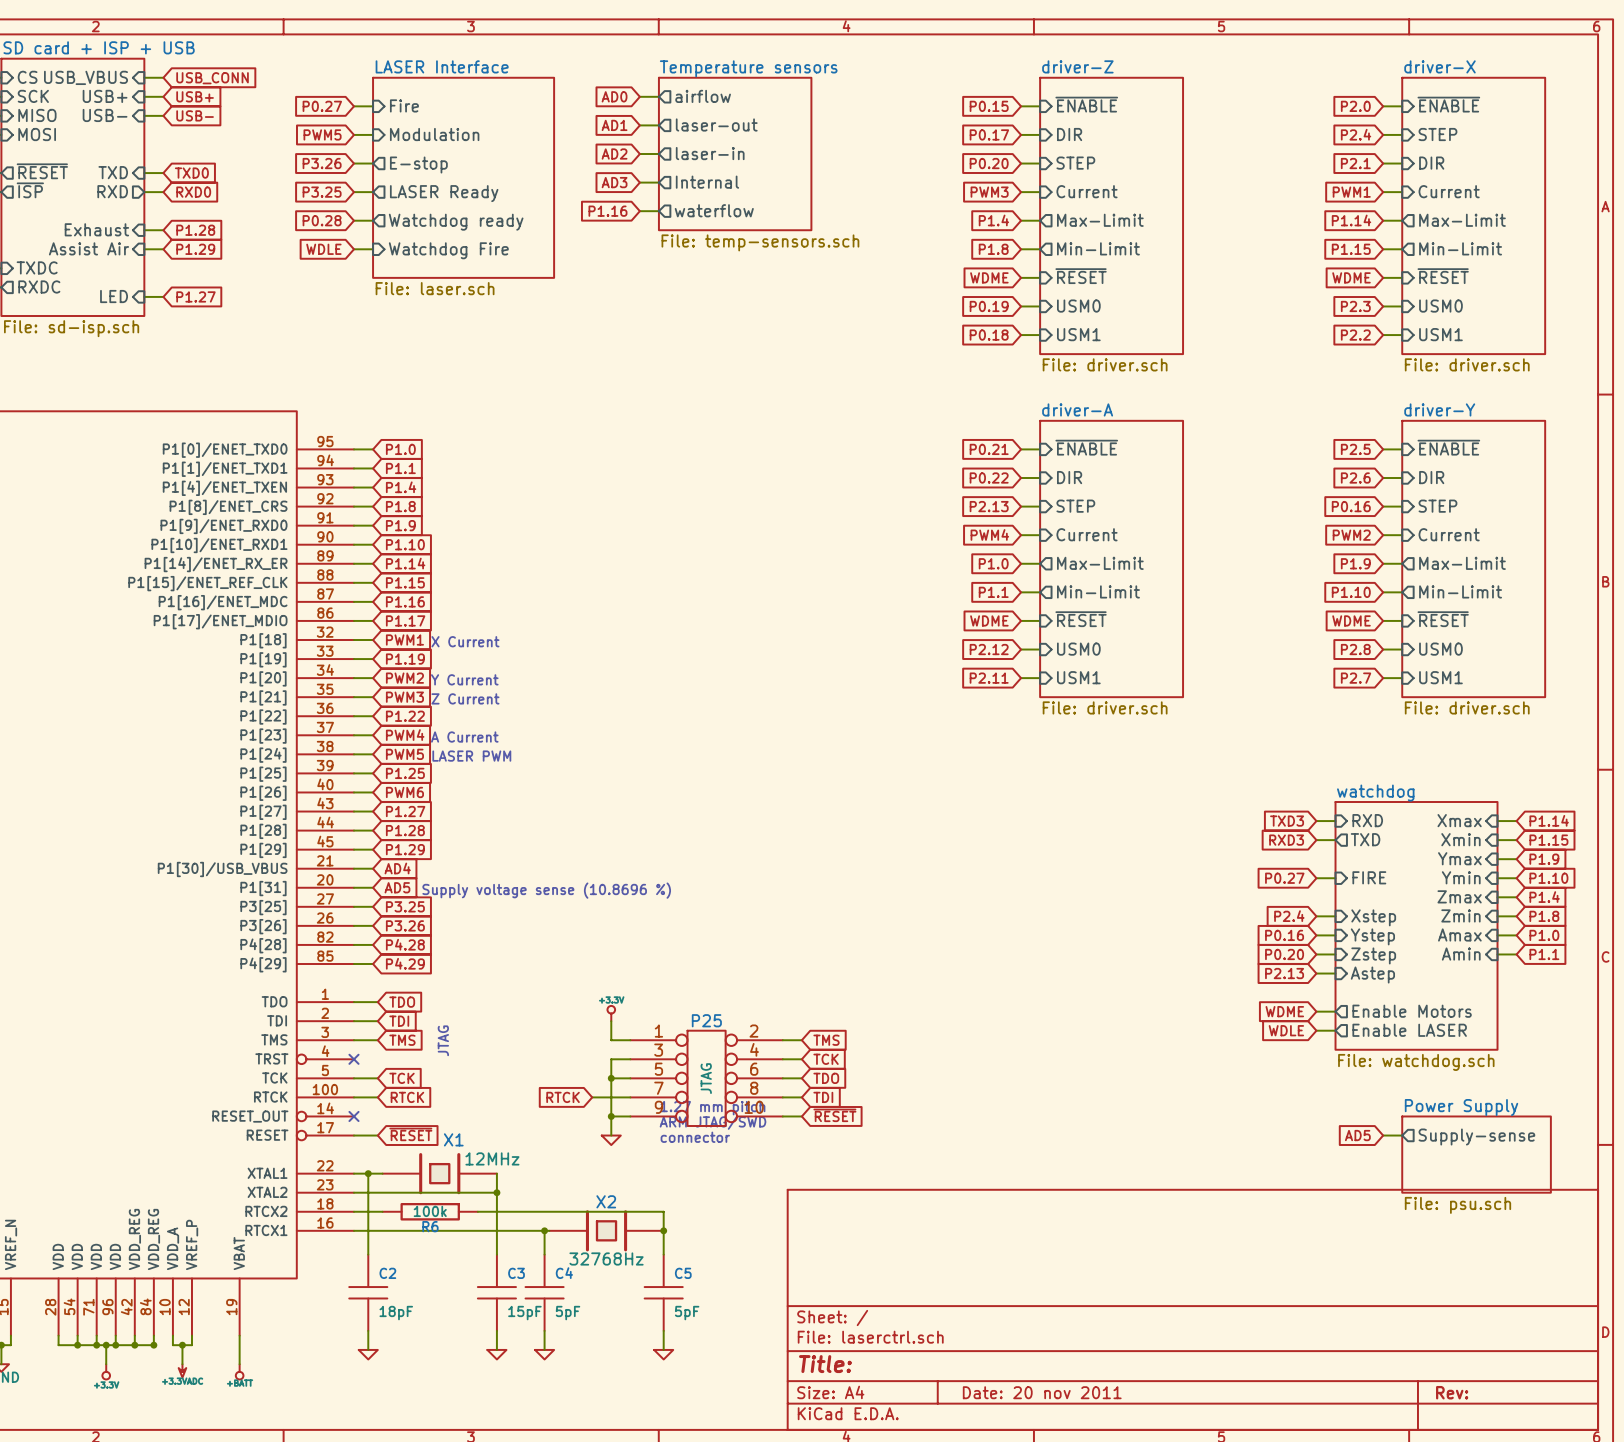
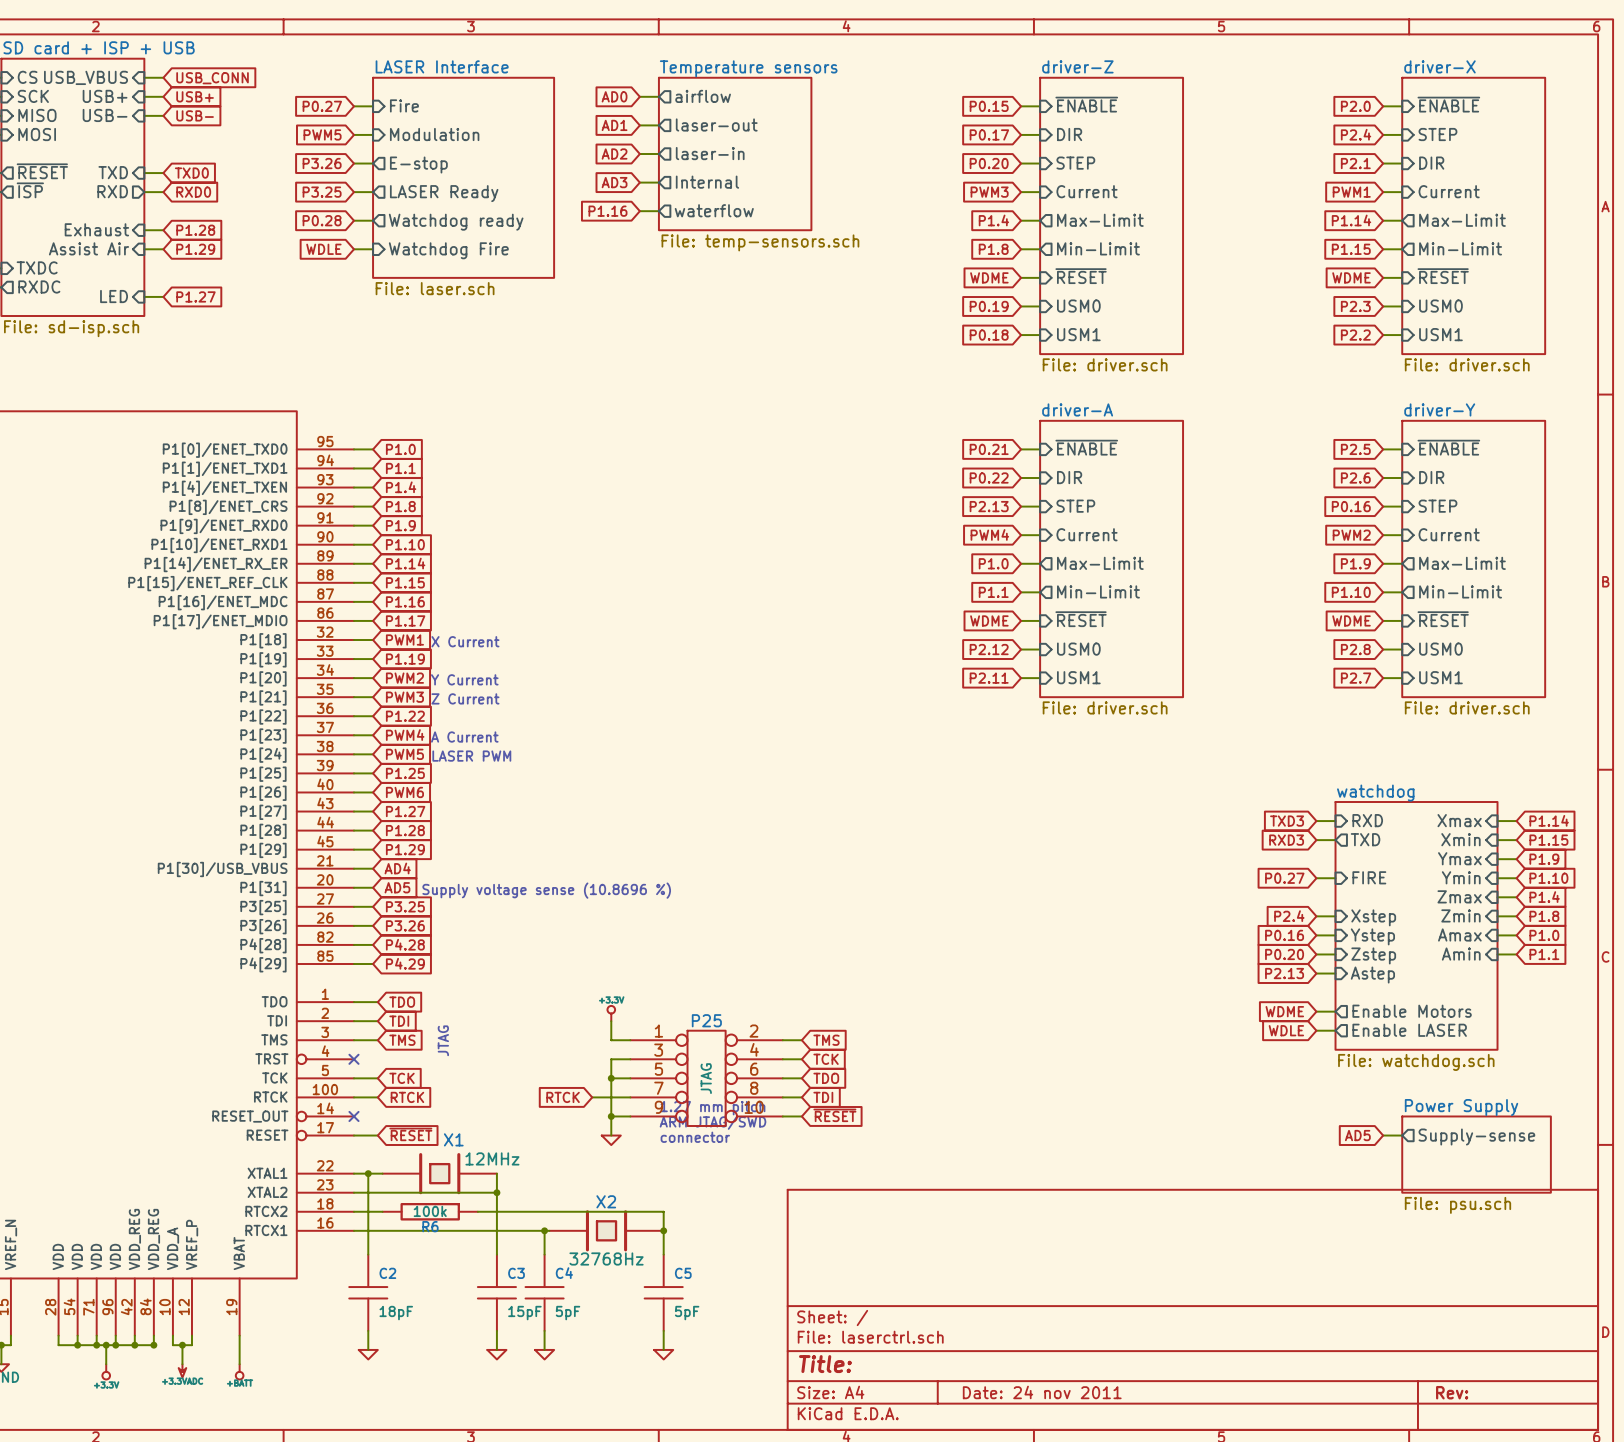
title block: Date: 20 nov 2011 (1042, 1392) -> Date: 24 nov 2011 (1042, 1392)

